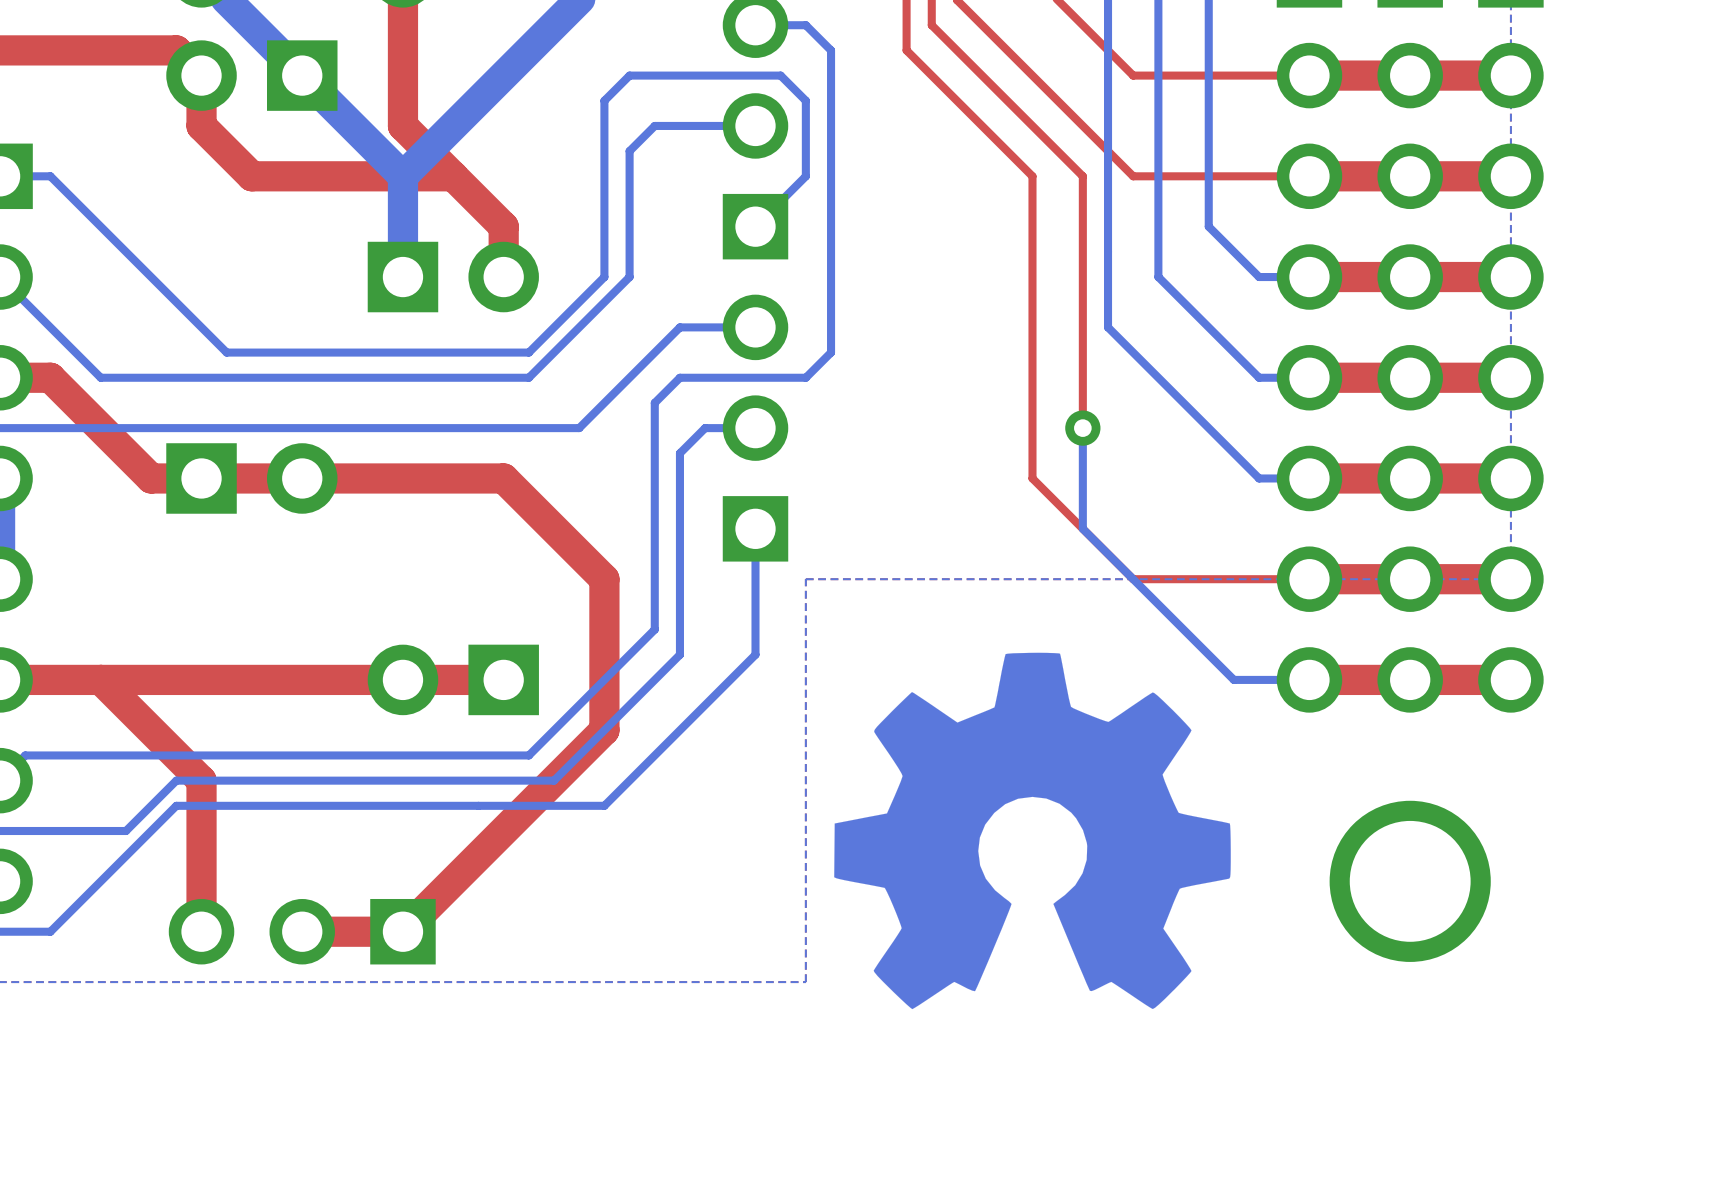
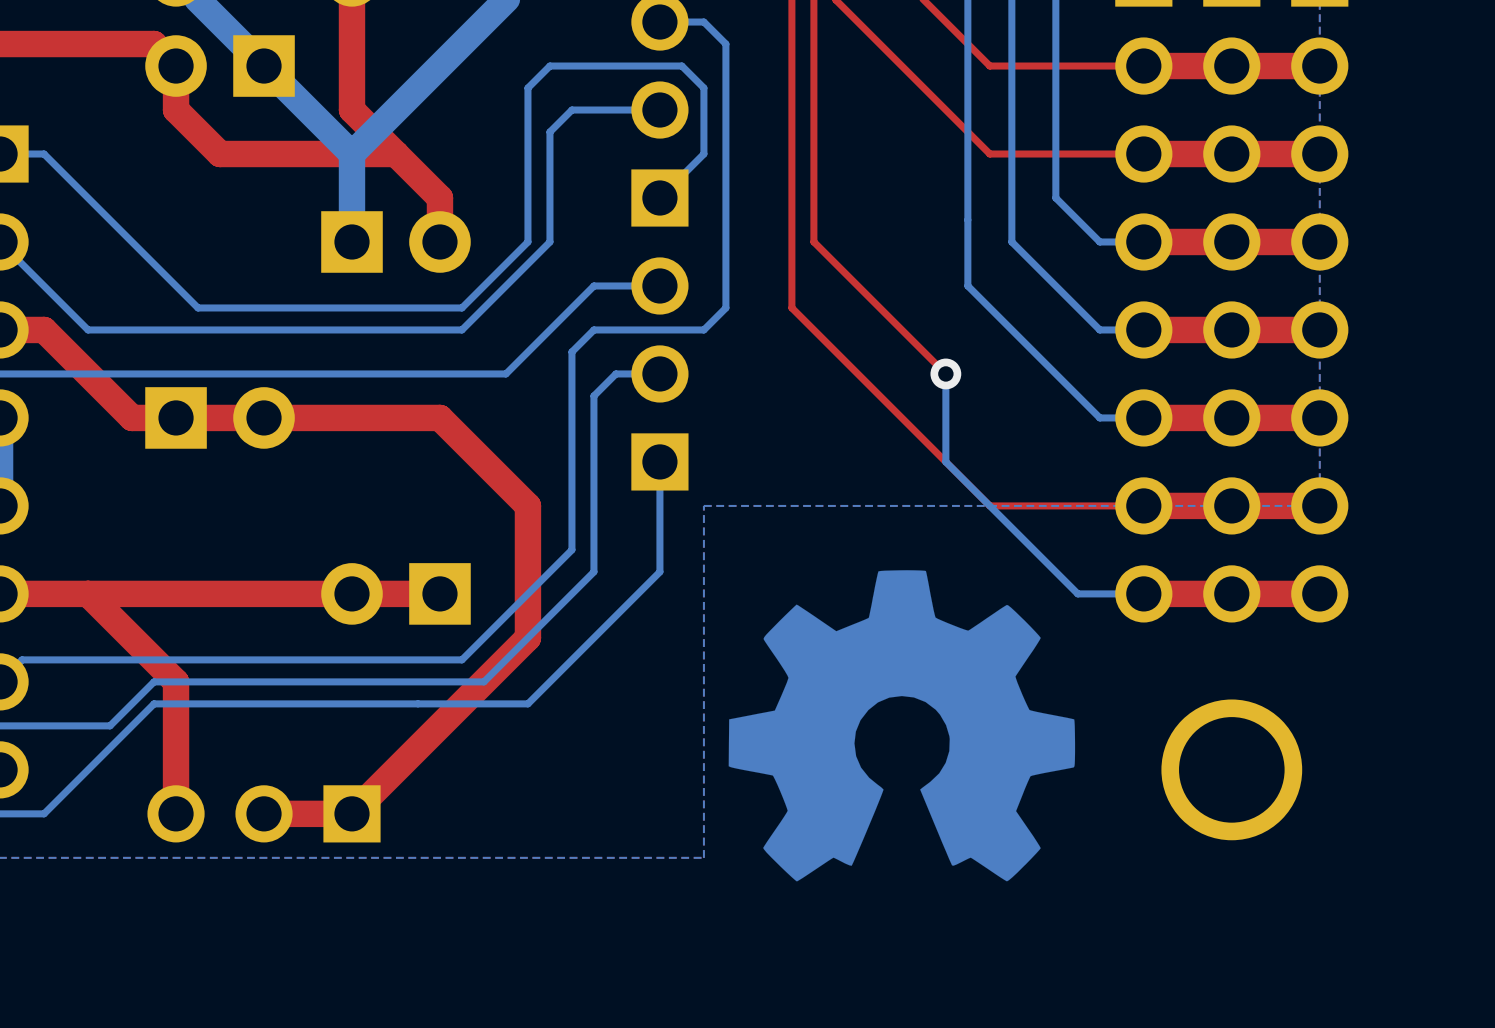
top track: (931, 25) (1082, 176) (1082, 428) -> (813, 22) (813, 241) (945, 373)
top track: (906, 50) (1032, 176) (1032, 478) -> (791, 44) (791, 307) (901, 417)

